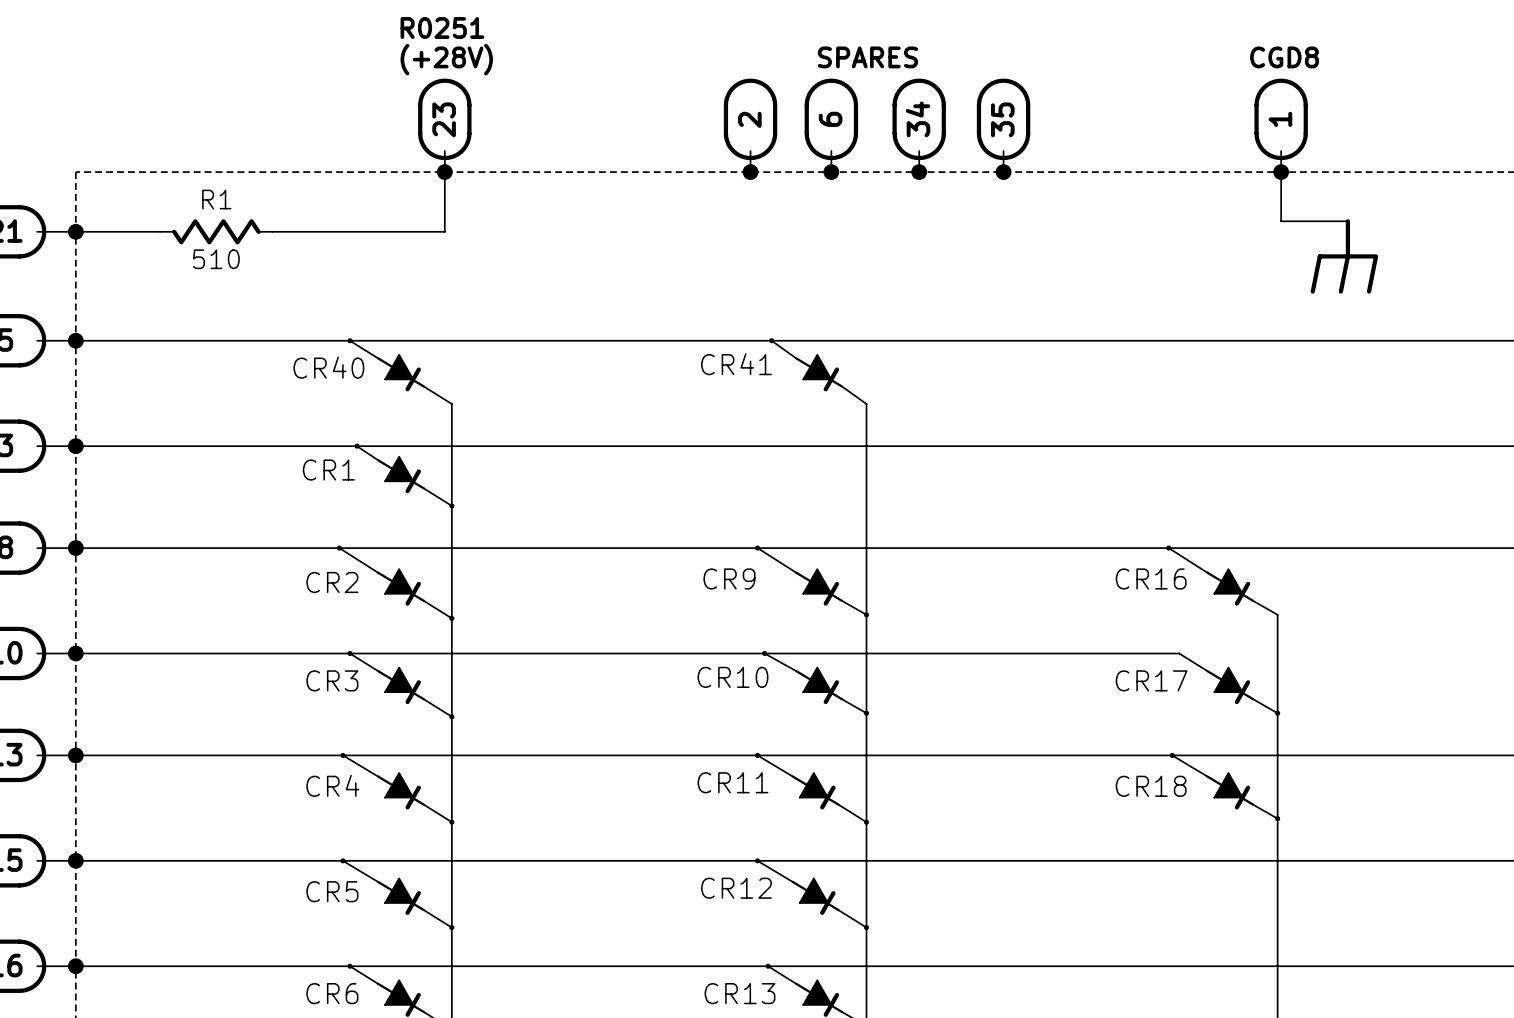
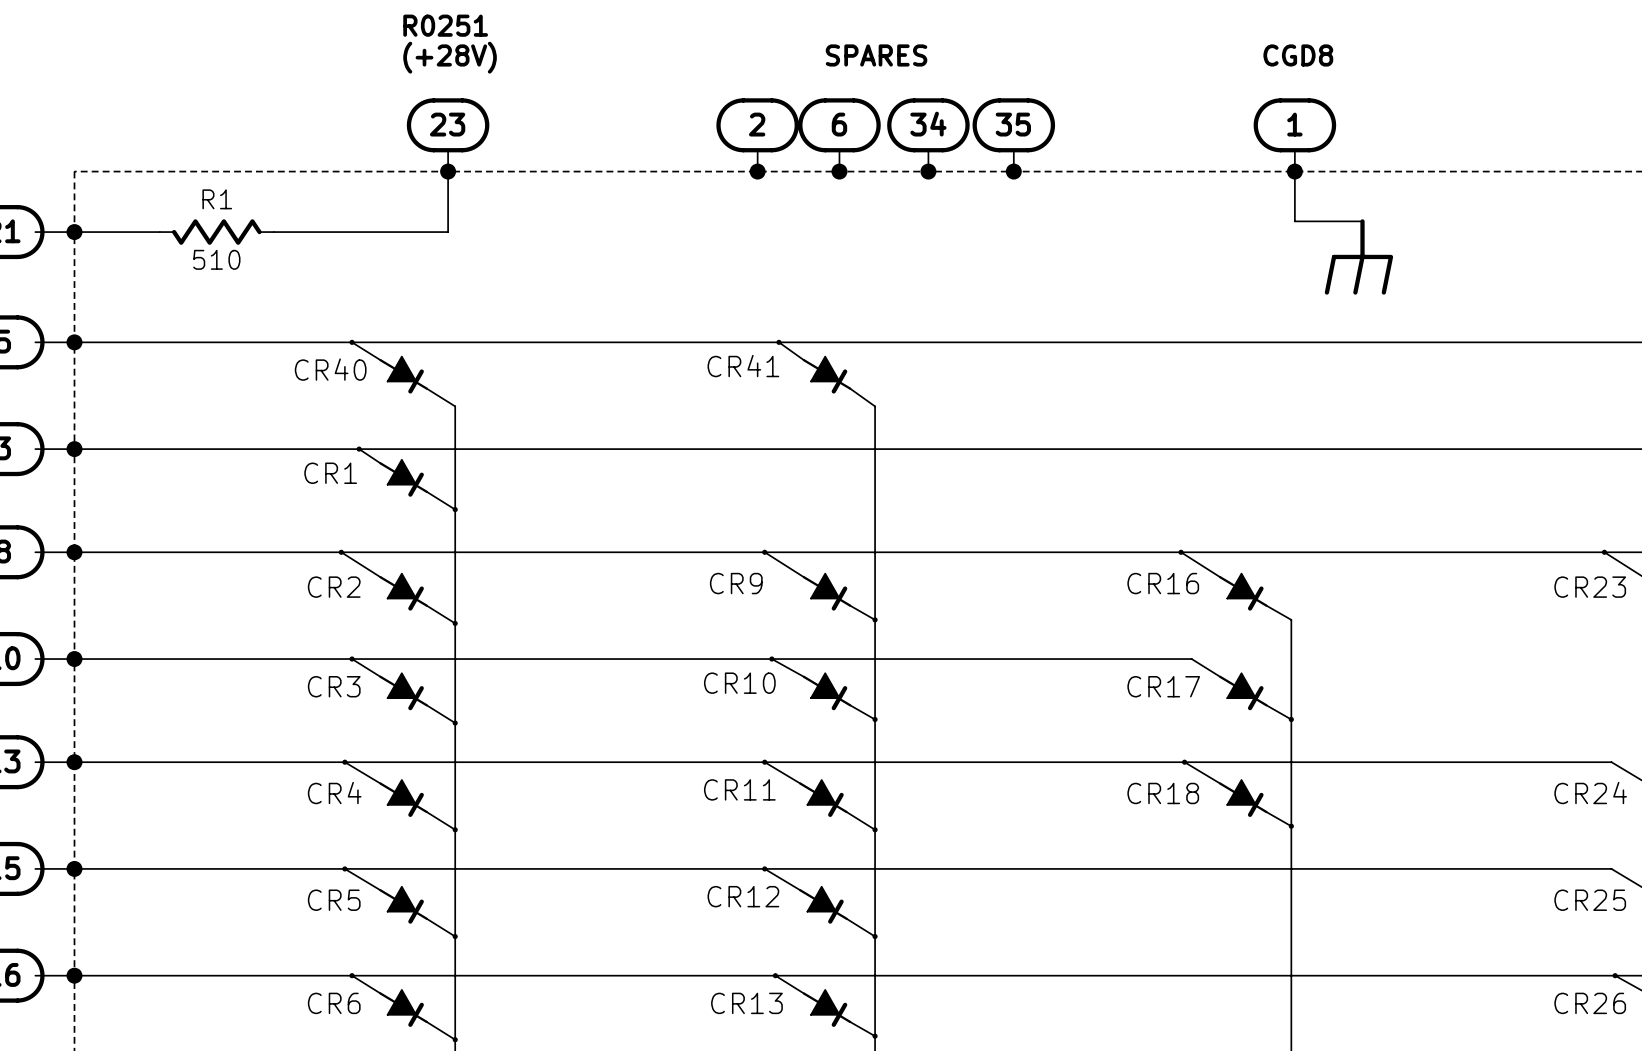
part rotation: 0° (444, 119) -> 90° clockwise (448, 125)
part rotation: 0° (750, 119) -> 90° clockwise (757, 125)
part rotation: 0° (831, 119) -> 90° clockwise (839, 125)
part rotation: 0° (919, 119) -> 90° clockwise (928, 125)
part rotation: 0° (1003, 119) -> 90° clockwise (1013, 125)
part rotation: 0° (1281, 119) -> 90° clockwise (1294, 125)

